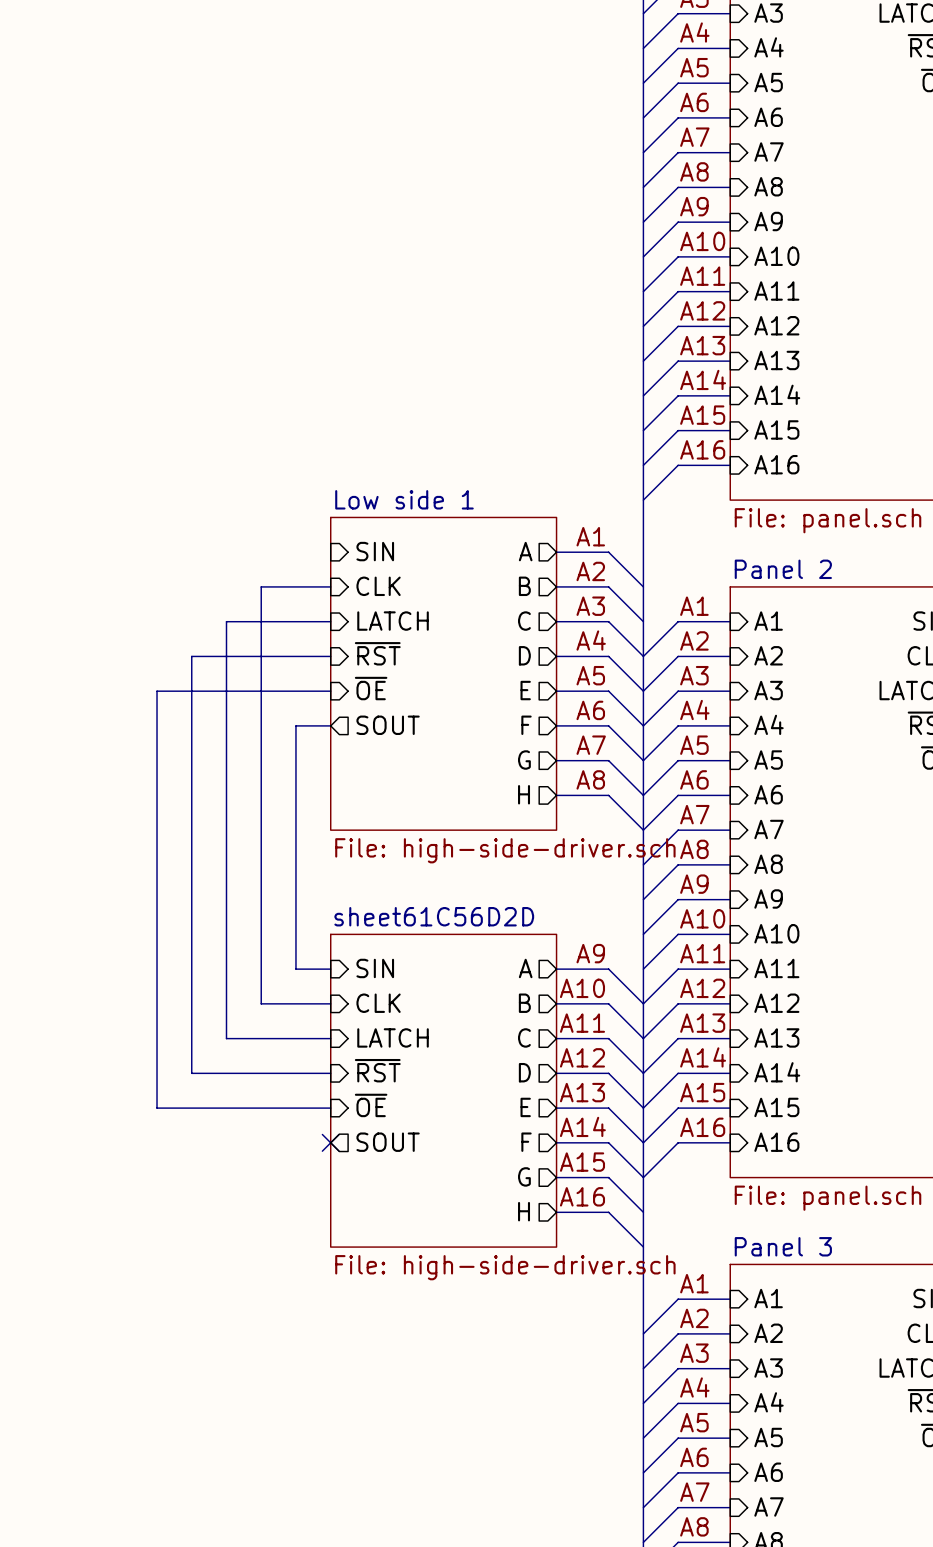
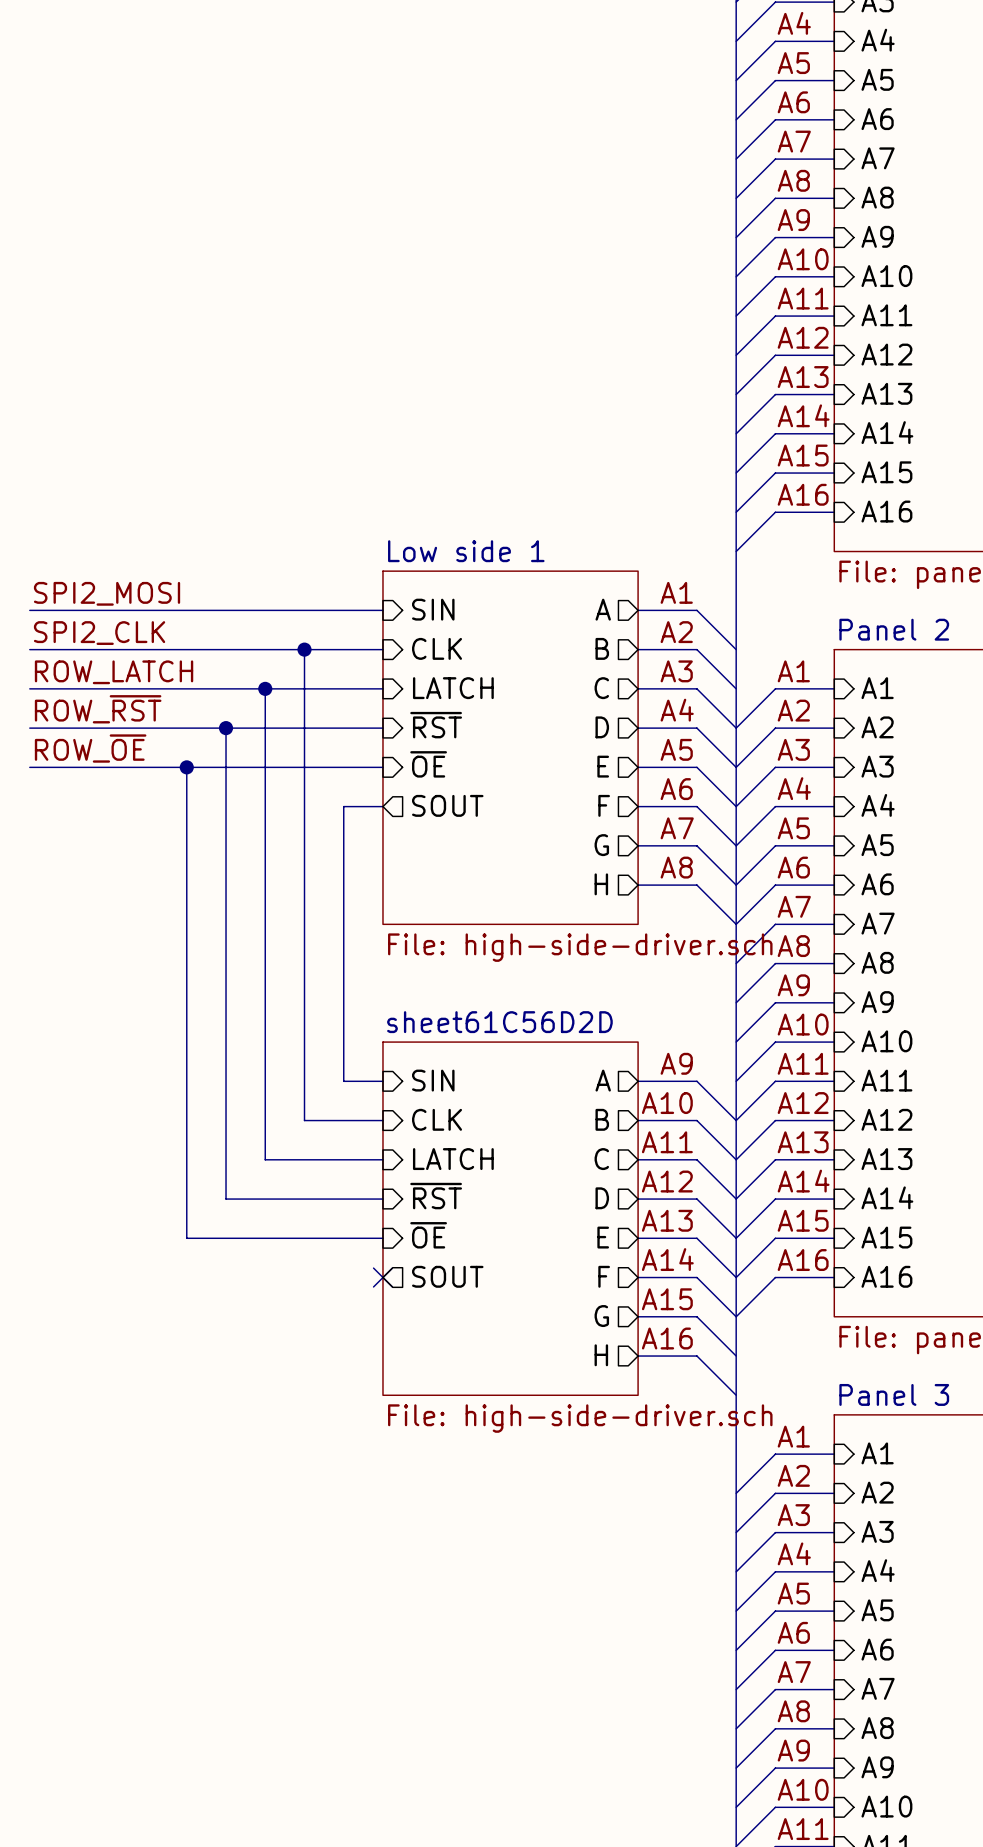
label: none -> SPI2_MOSI (107, 593)
wire: none -> (29, 610) (382, 610)
label: none -> SPI2_CLK (99, 633)
wire: none -> (29, 649) (304, 649)
junction: none -> (304, 649)
label: none -> ROW_LATCH (114, 672)
wire: none -> (29, 688) (265, 688)
junction: none -> (265, 688)
label: none -> ROW_~{RST} (98, 709)
wire: none -> (29, 728) (226, 728)
junction: none -> (226, 728)
label: none -> ROW_~{OE} (90, 748)
wire: none -> (29, 767) (186, 767)
junction: none -> (186, 767)

